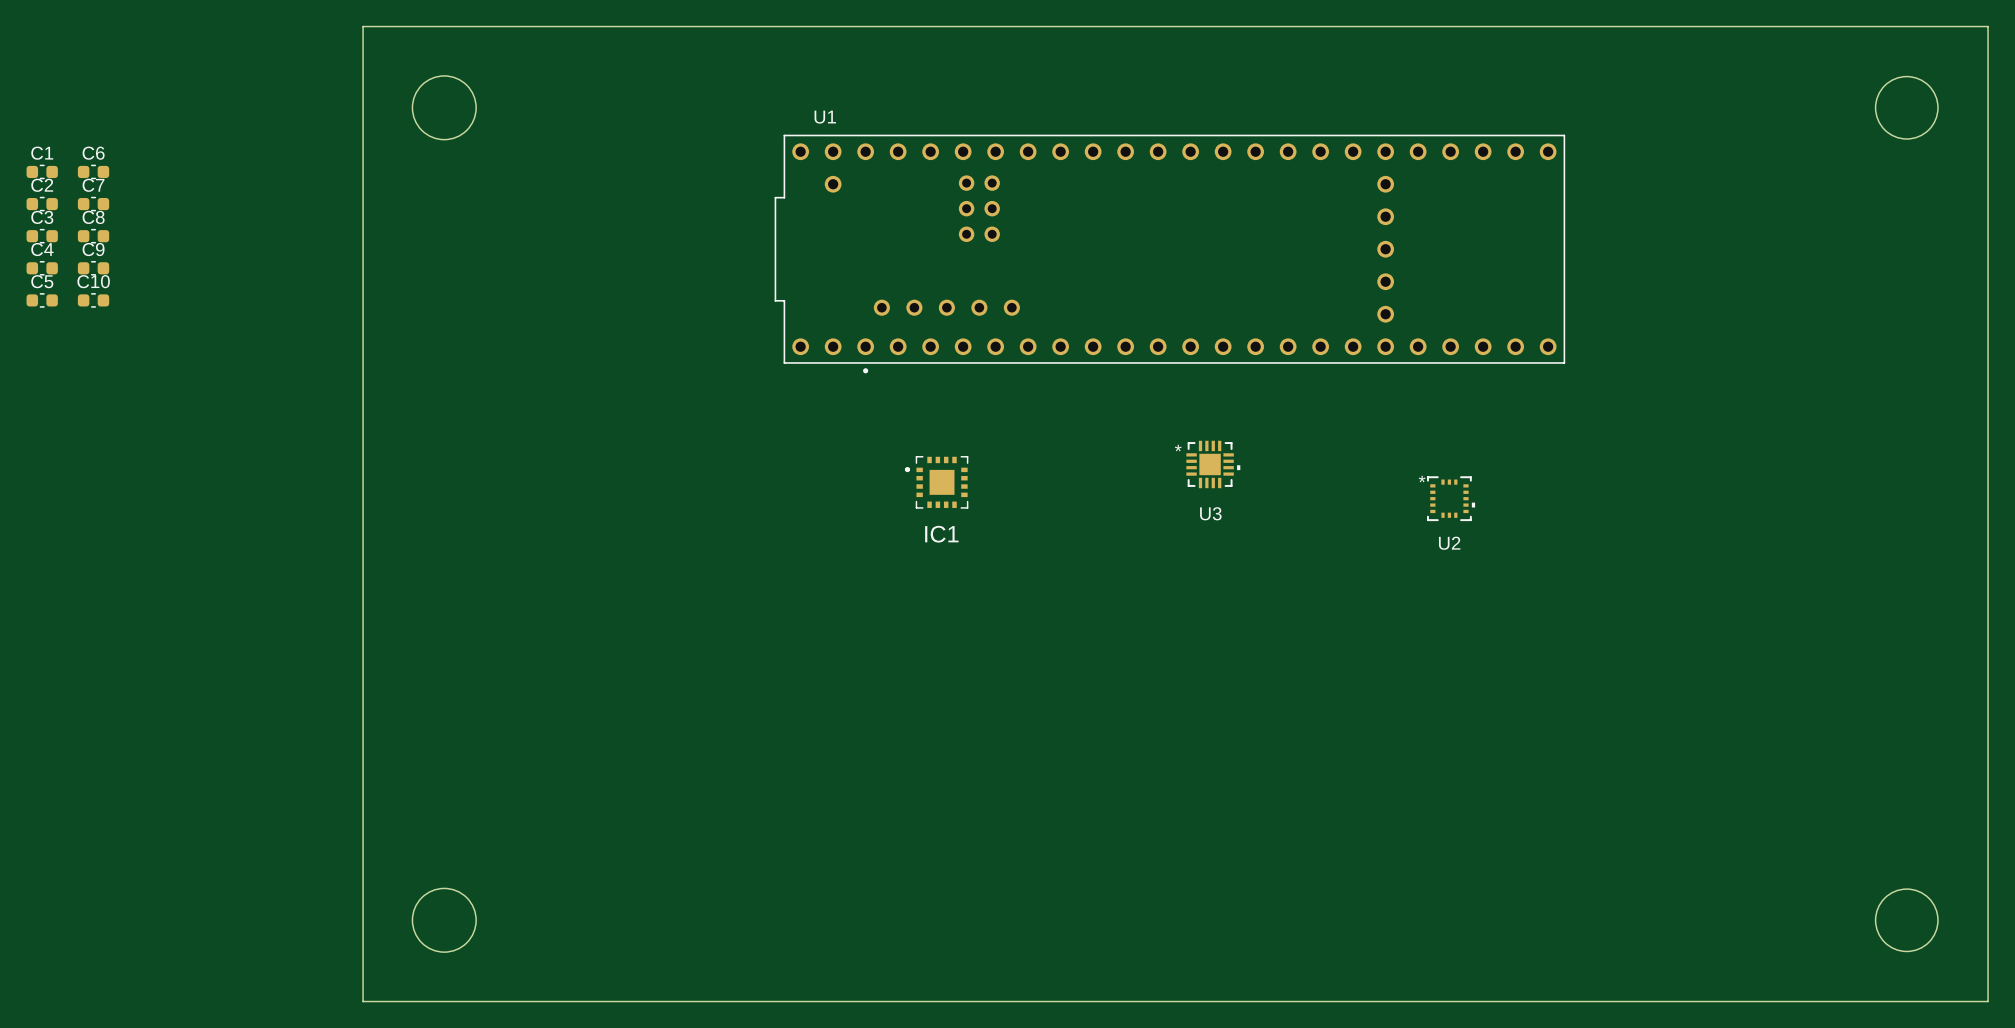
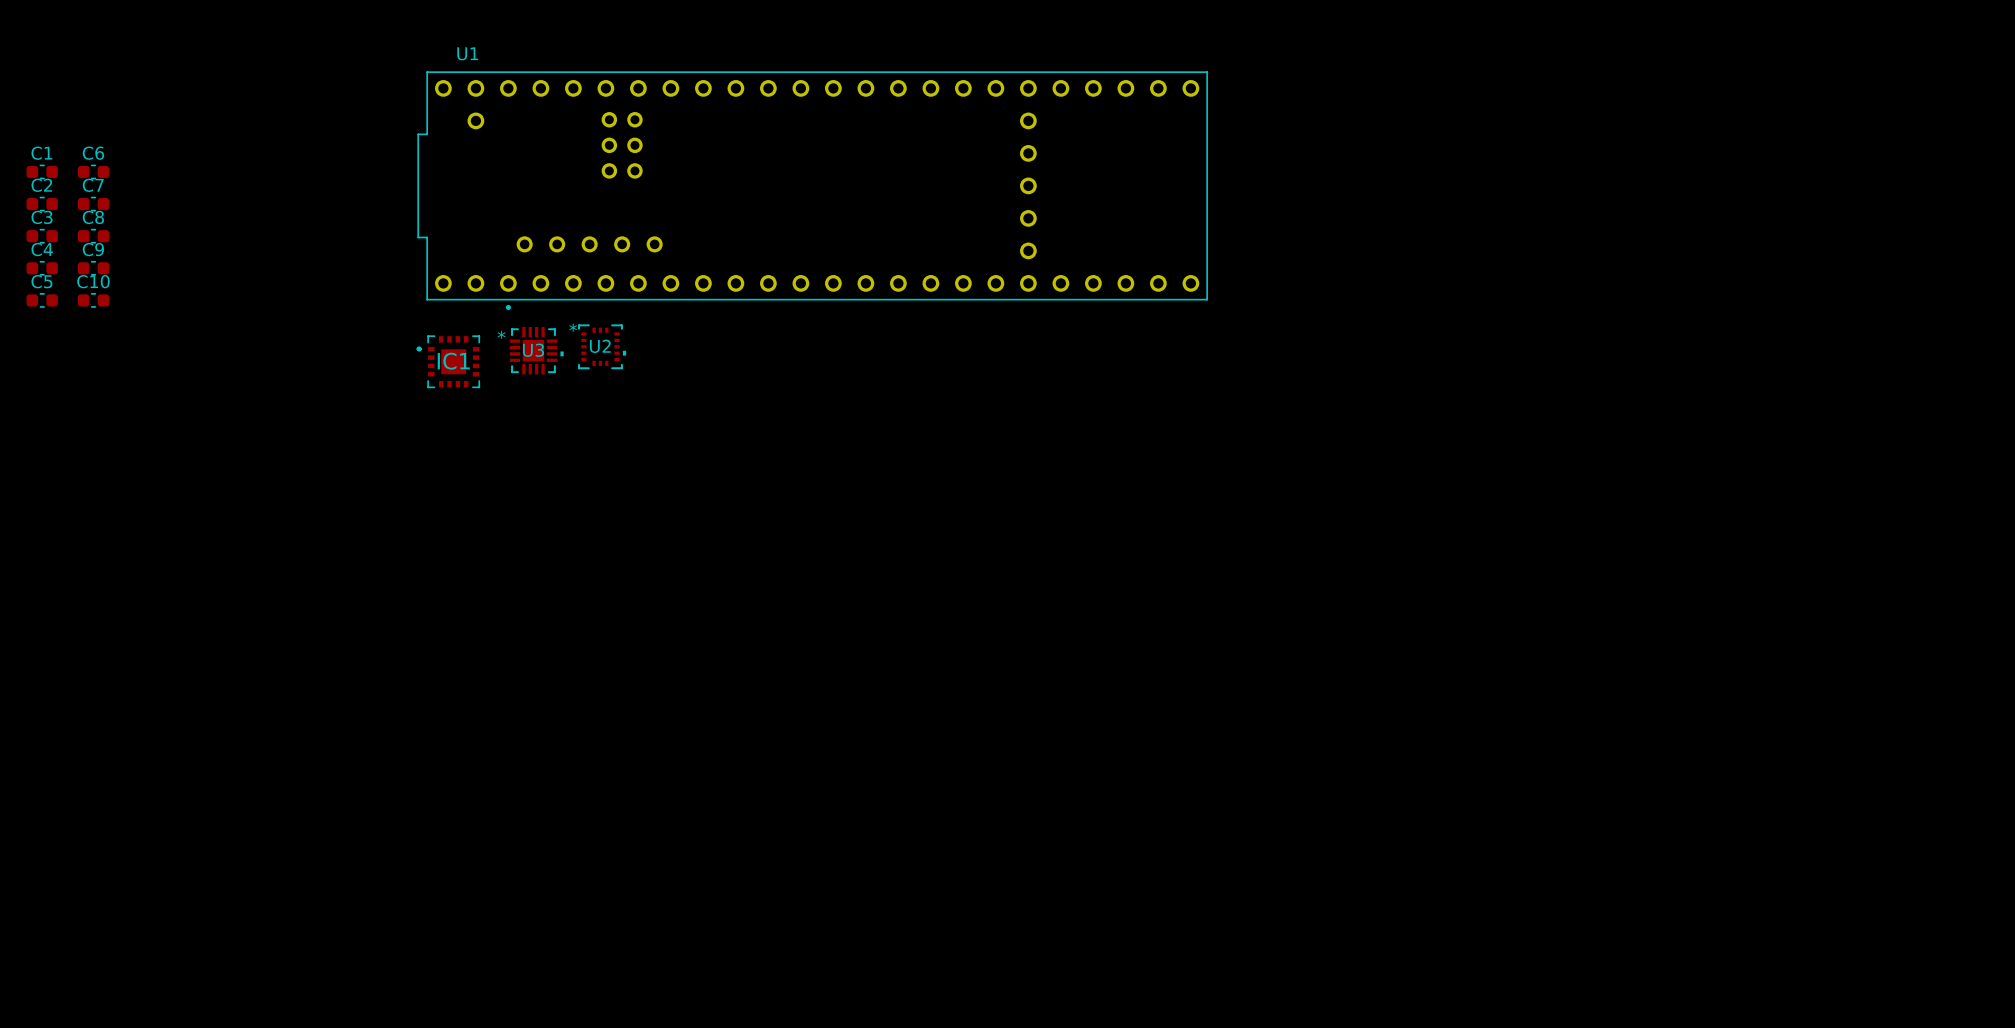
board edge: (363, 26) (1988, 26) (1988, 1001) (363, 1001) (363, 26) -> none
round board edge: [412, 75, 477, 140] -> none
round board edge: [1875, 76, 1939, 140] -> none
U1 position: (1169, 254) -> (812, 190)
U3 position: (1213, 464) -> (536, 350)
IC1 position: (936, 482) -> (448, 361)
U2 position: (1451, 498) -> (602, 346)
U3 name position: U3 (1210, 513) -> U3 (533, 350)
IC1 name position: IC1 (941, 534) -> IC1 (453, 361)
U2 name position: U2 (1449, 543) -> U2 (600, 346)
round board edge: [412, 888, 477, 953] -> none
round board edge: [1875, 888, 1939, 952] -> none

